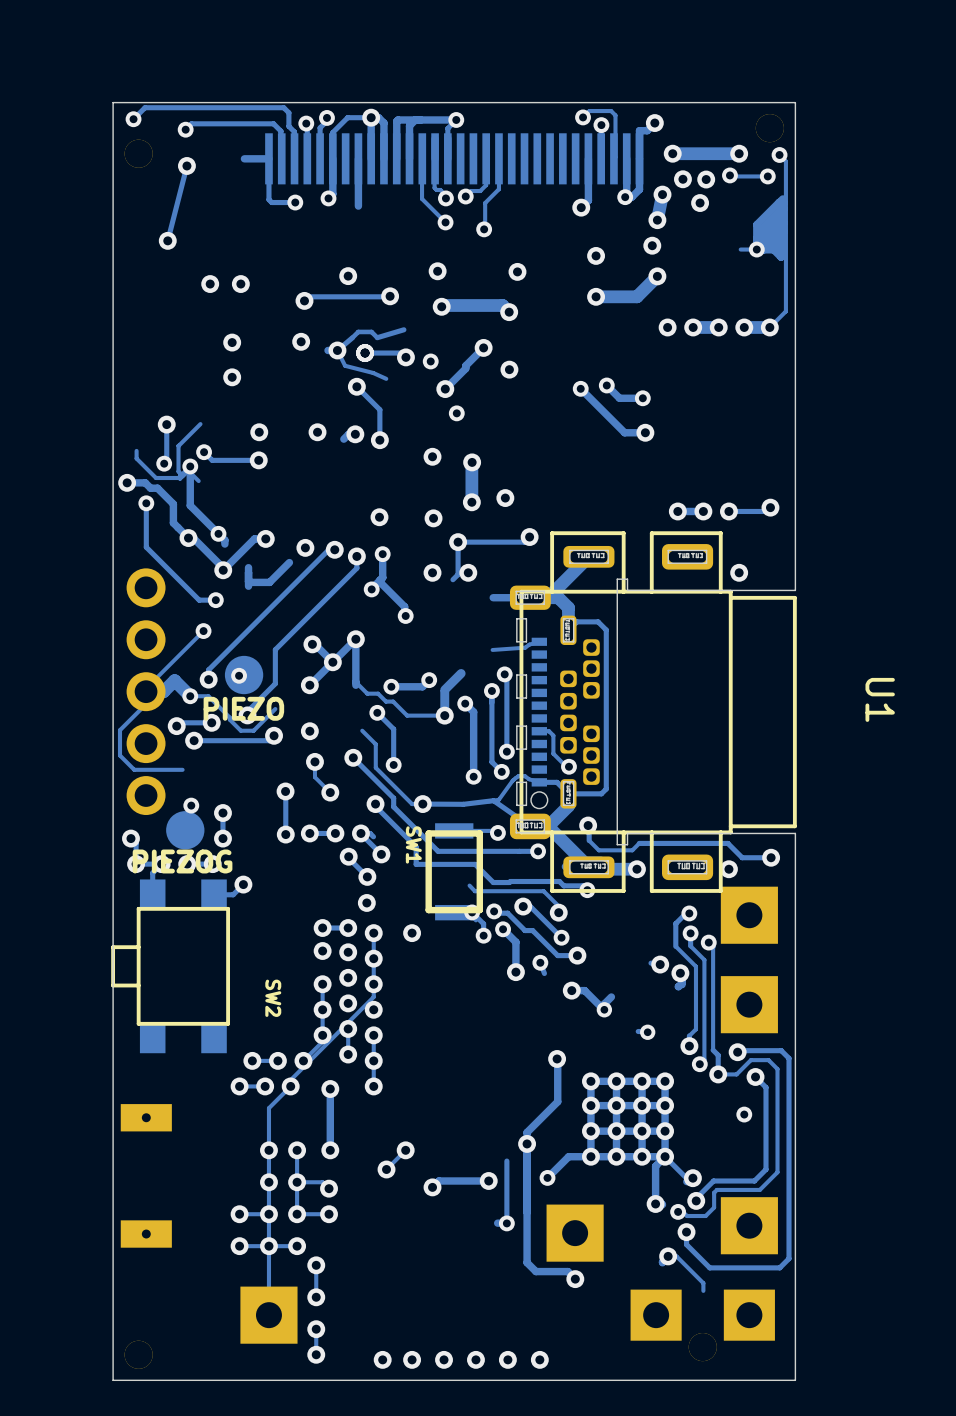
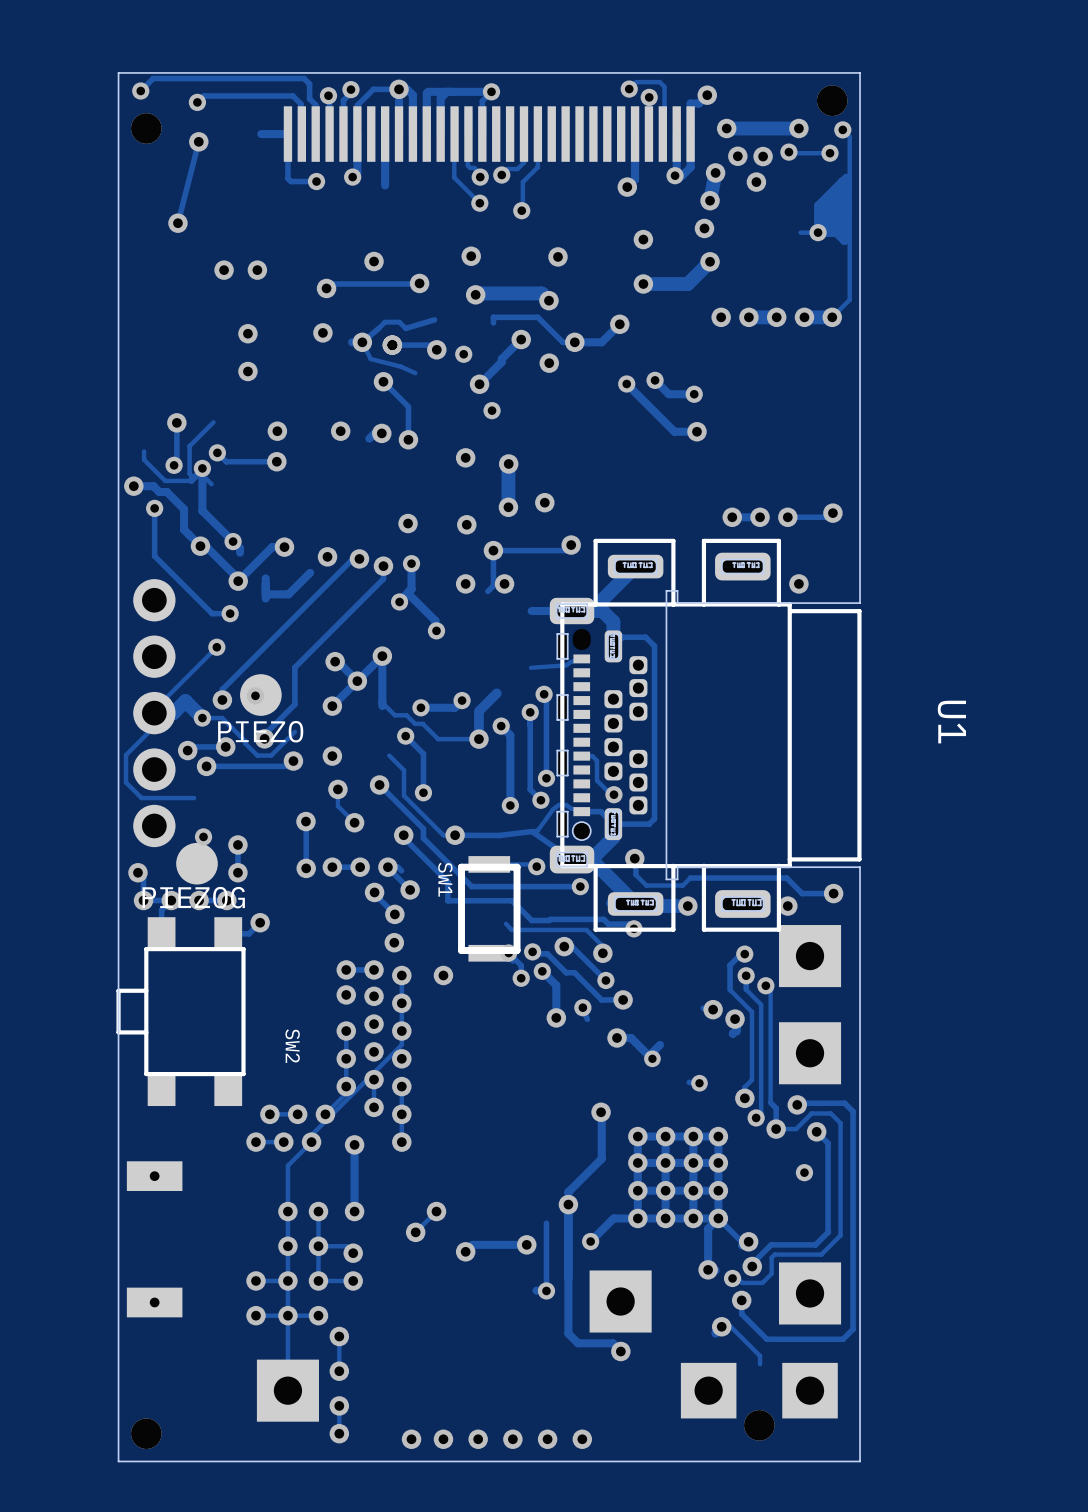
track: none -> (493, 322) (493, 317) (537, 317) (562, 342) (601, 342) (619, 324)
via: none -> (619, 324)
via: none -> (574, 342)

